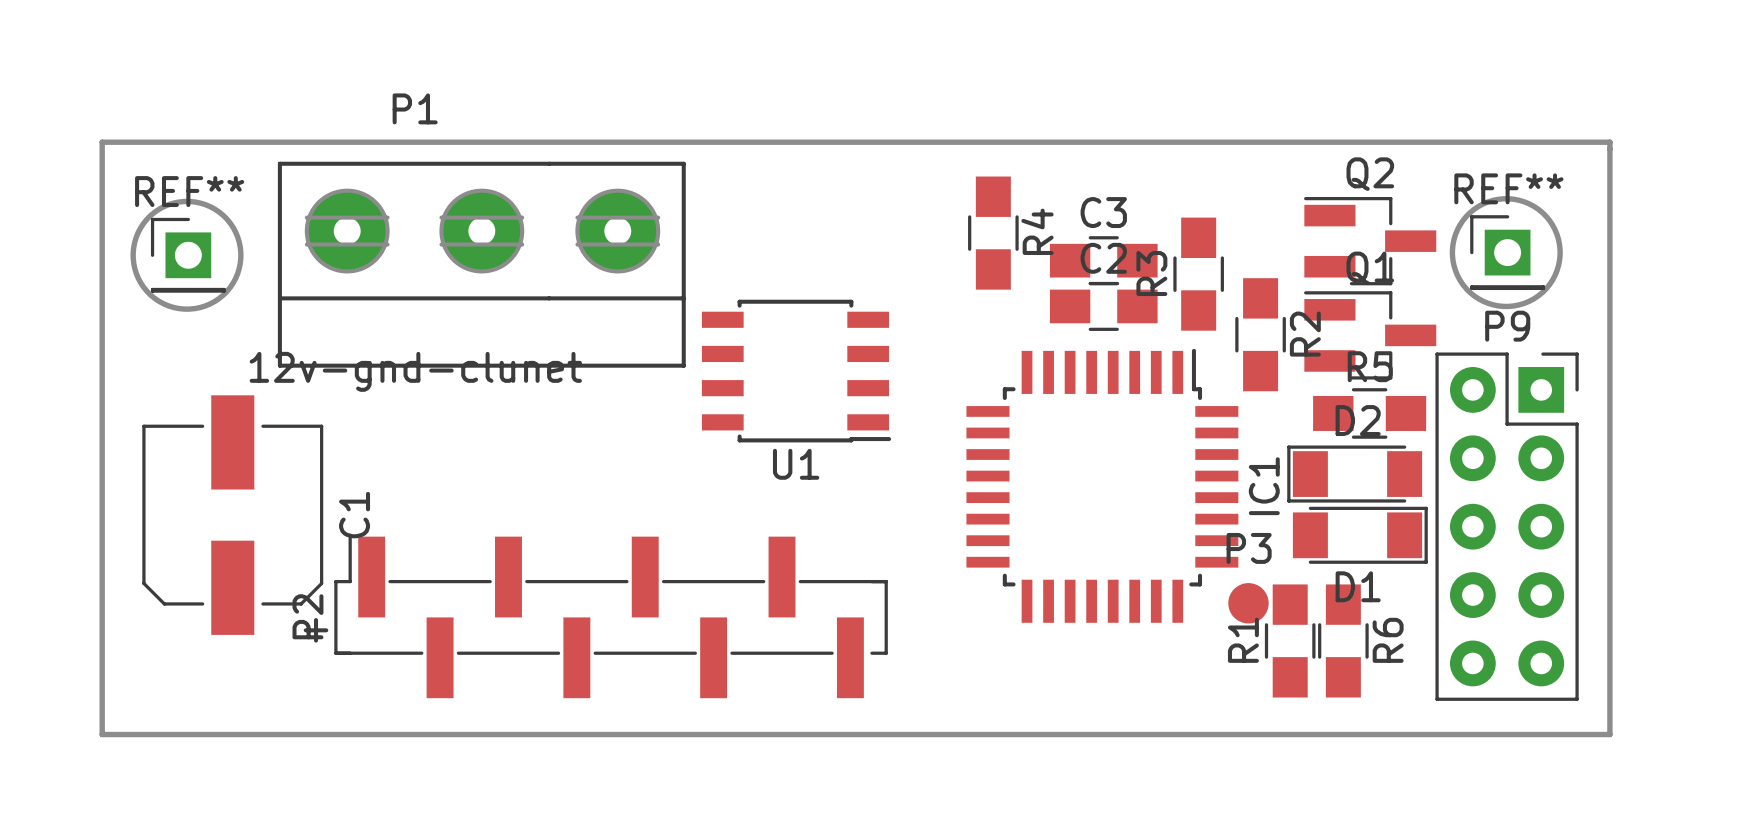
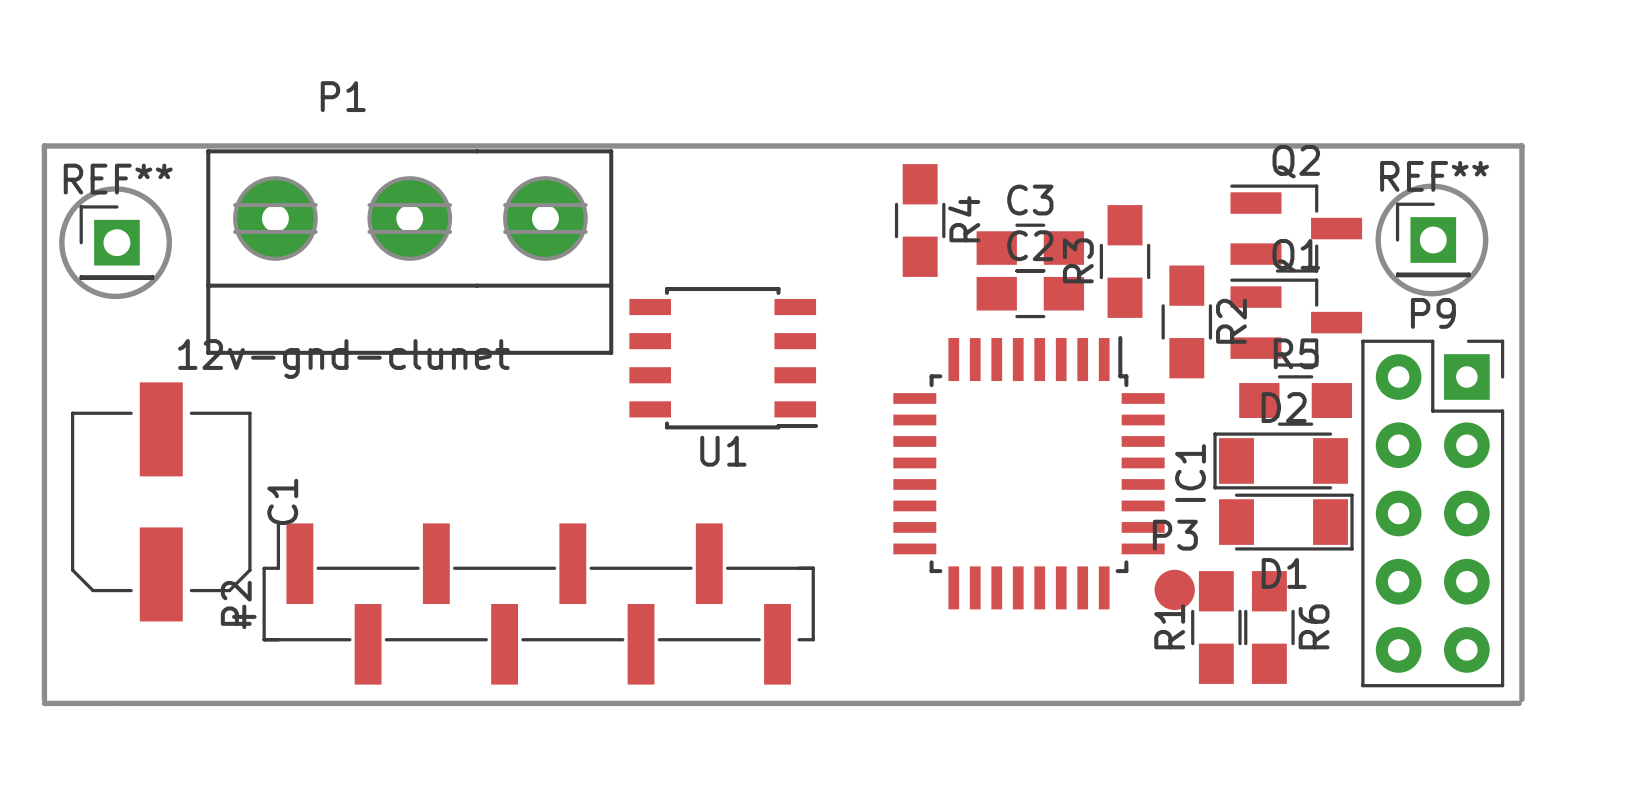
line: (102, 142) (1609, 142) (1609, 734) (102, 734) (102, 142) -> none
line: none -> (44, 699) (44, 145) (1521, 145) (1521, 699)
line: none -> (44, 703) (114, 703)
line: none -> (115, 703) (1519, 703)

